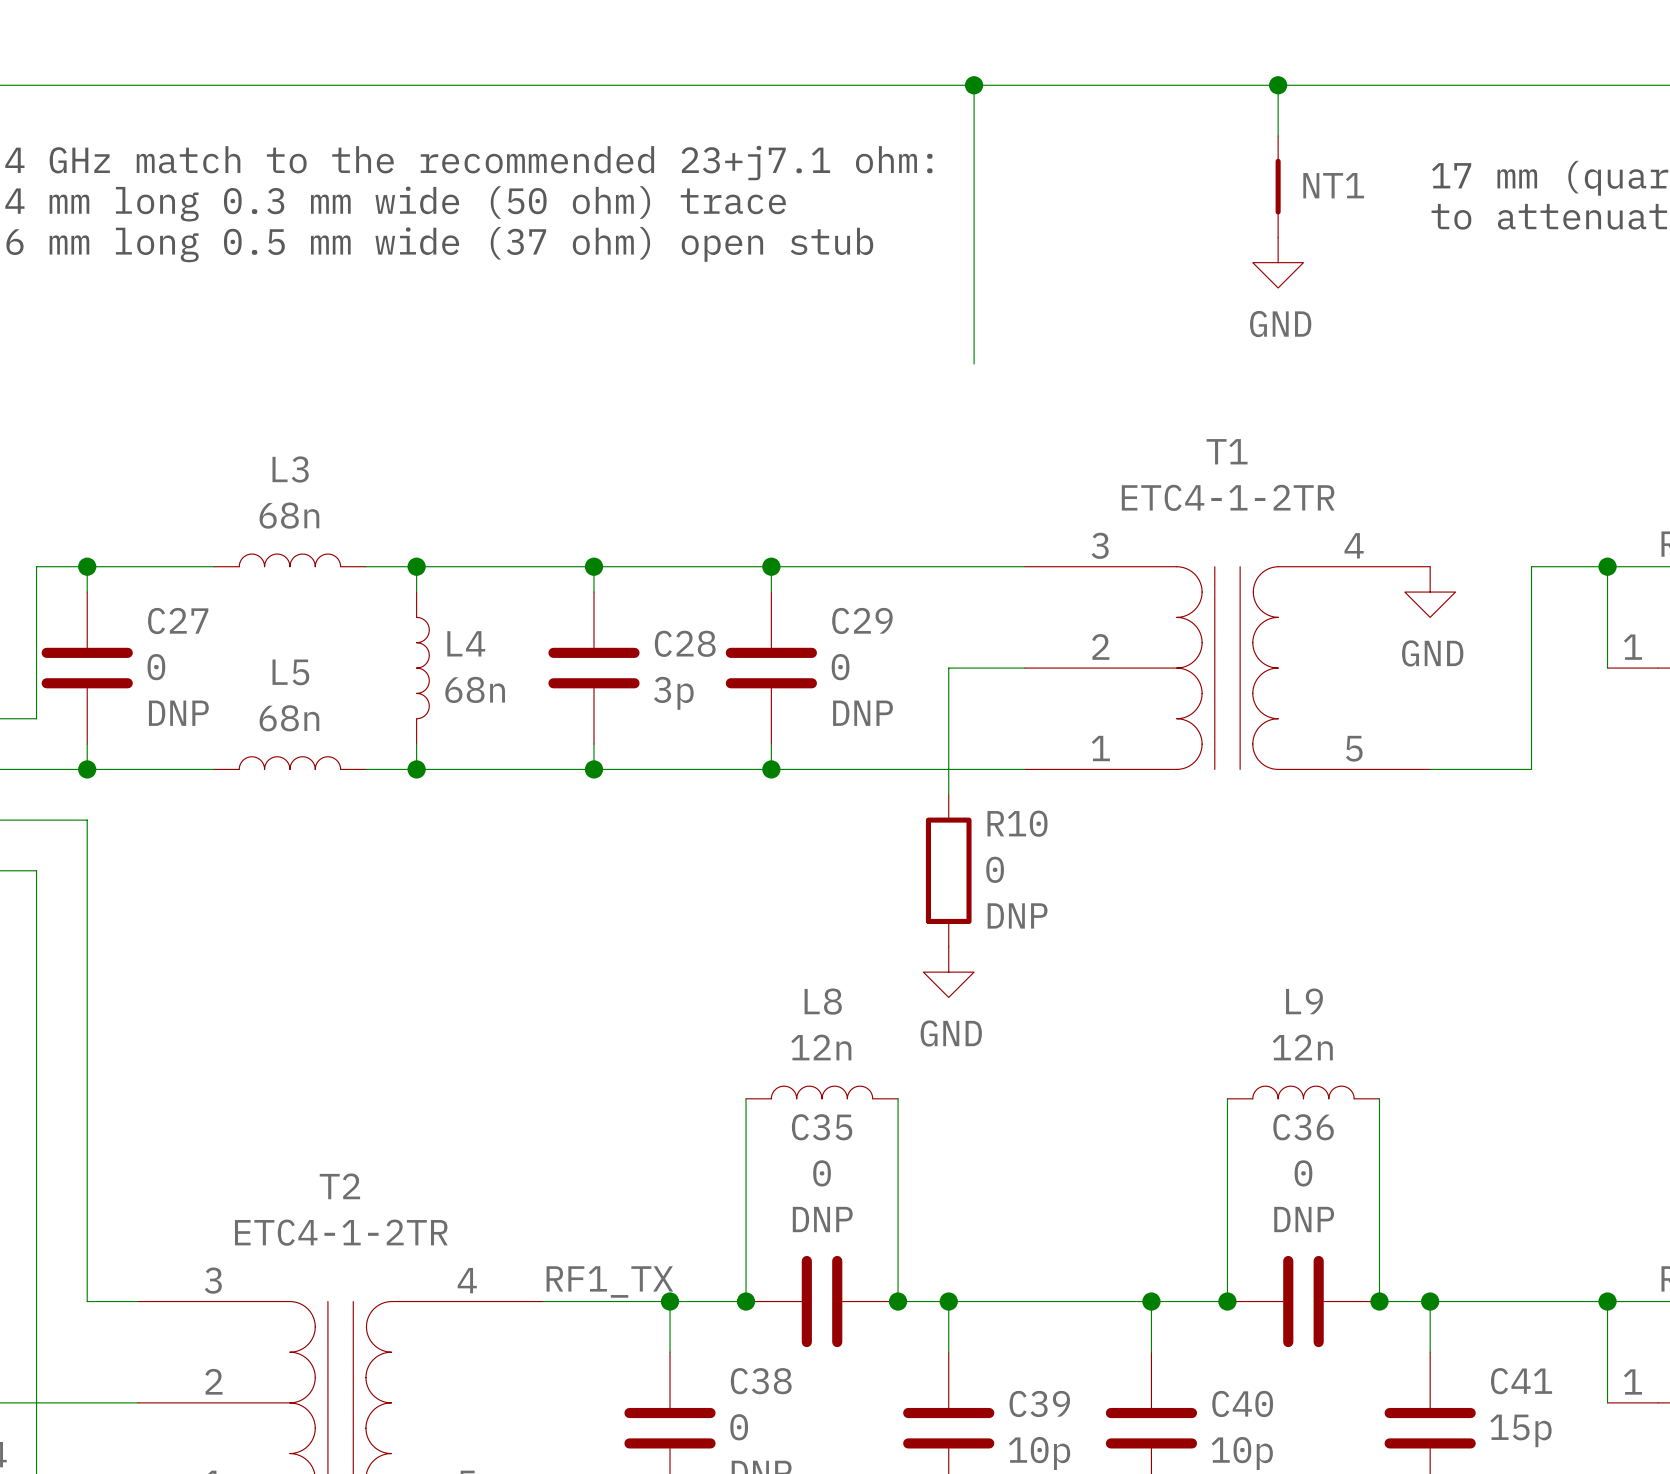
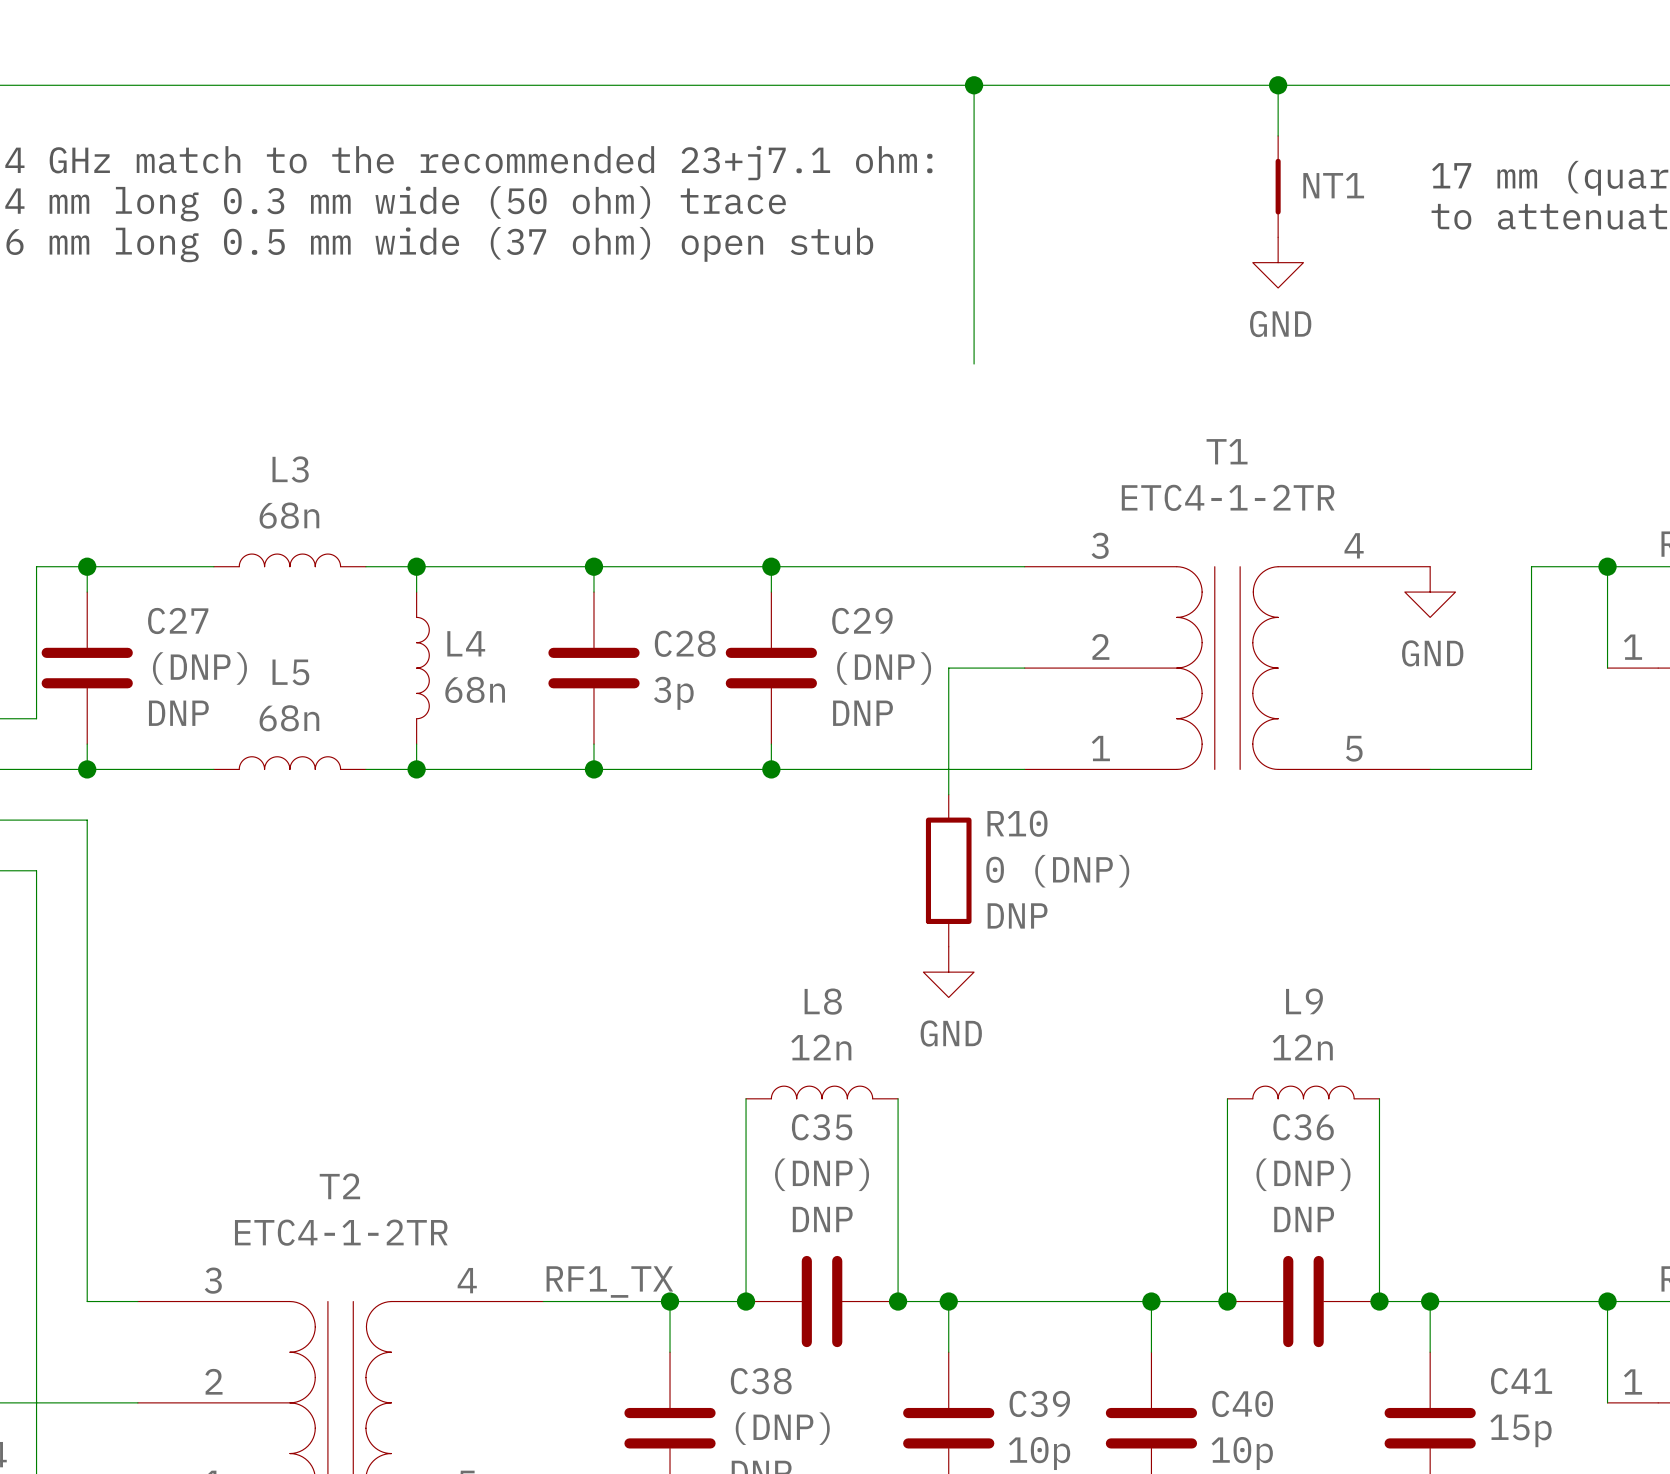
C27 value: 0 (156, 667) -> (DNP) (199, 668)
C29 value: 0 (840, 667) -> (DNP) (884, 668)
R10 value: 0 (995, 869) -> 0 (DNP) (1057, 871)
C35 value: 0 (822, 1173) -> (DNP) (822, 1174)
C36 value: 0 (1303, 1173) -> (DNP) (1303, 1174)
C38 value: 0 (739, 1427) -> (DNP) (782, 1428)

